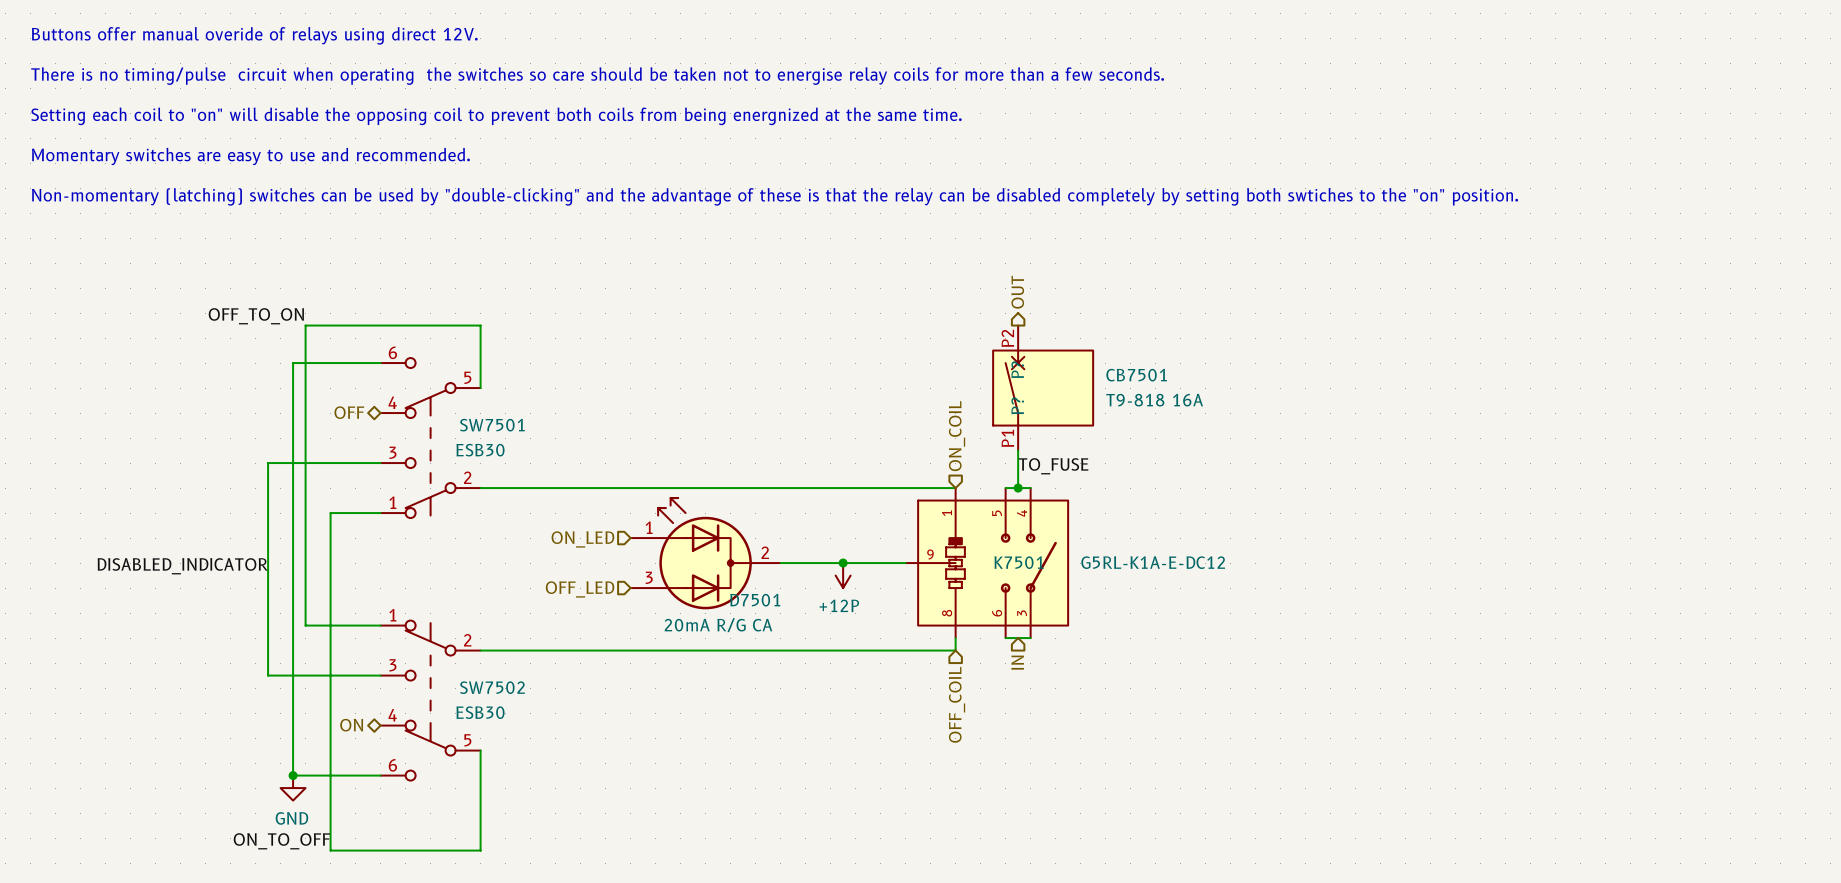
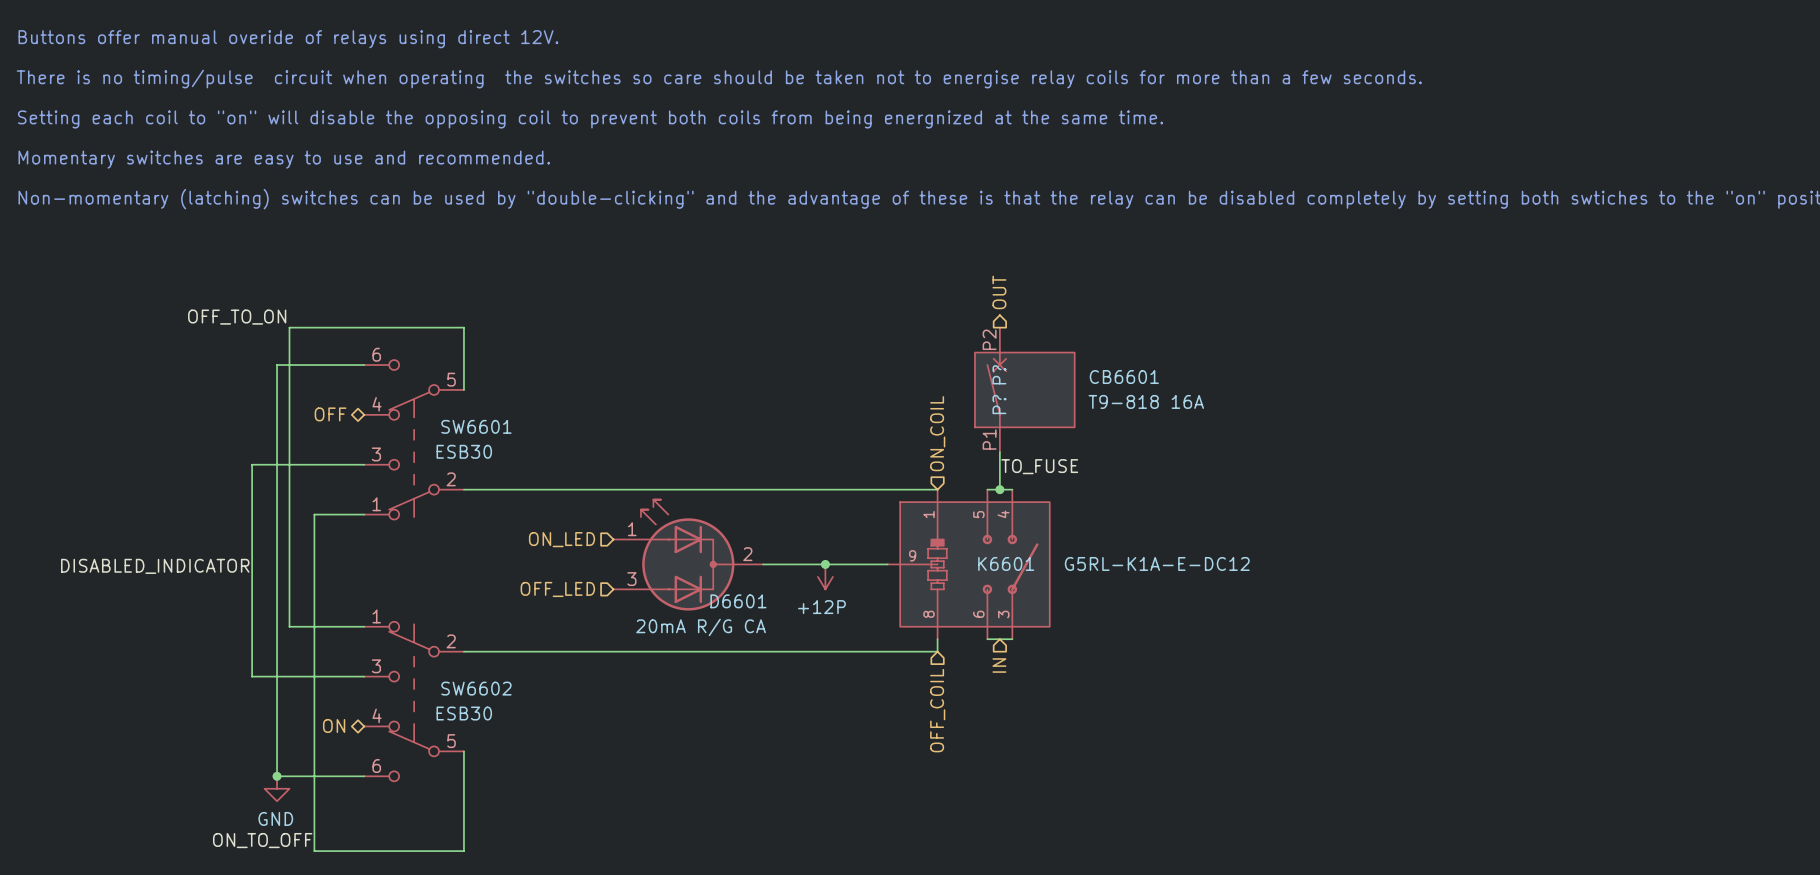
CB7501 name: CB7501 (1136, 375) -> CB6601 (1124, 377)
SW7501 name: SW7501 (492, 425) -> SW6601 (476, 426)
K7501 name: K7501 (1019, 562) -> K6601 (1006, 563)
D7501 name: D7501 (755, 600) -> D6601 (738, 601)
SW7502 name: SW7502 (492, 687) -> SW6602 (476, 688)

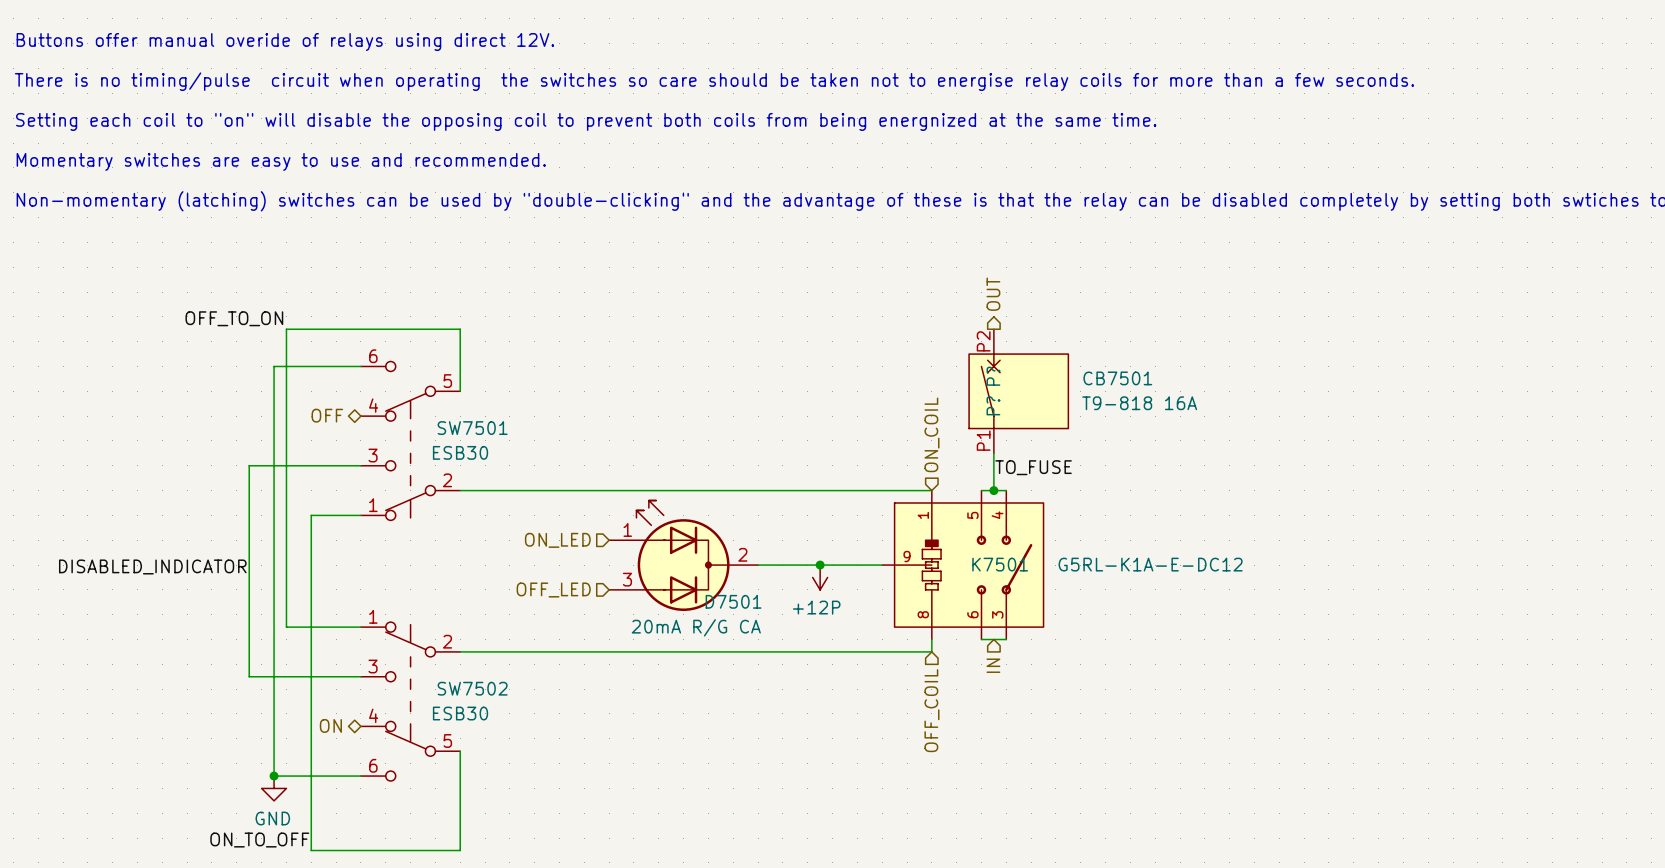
CB6601 name: CB6601 (1124, 377) -> CB7501 (1117, 378)
SW6601 name: SW6601 (476, 426) -> SW7501 (472, 428)
K6601 name: K6601 (1006, 563) -> K7501 (1000, 564)
D6601 name: D6601 (738, 601) -> D7501 (733, 601)
SW6602 name: SW6602 (476, 688) -> SW7502 (472, 688)

